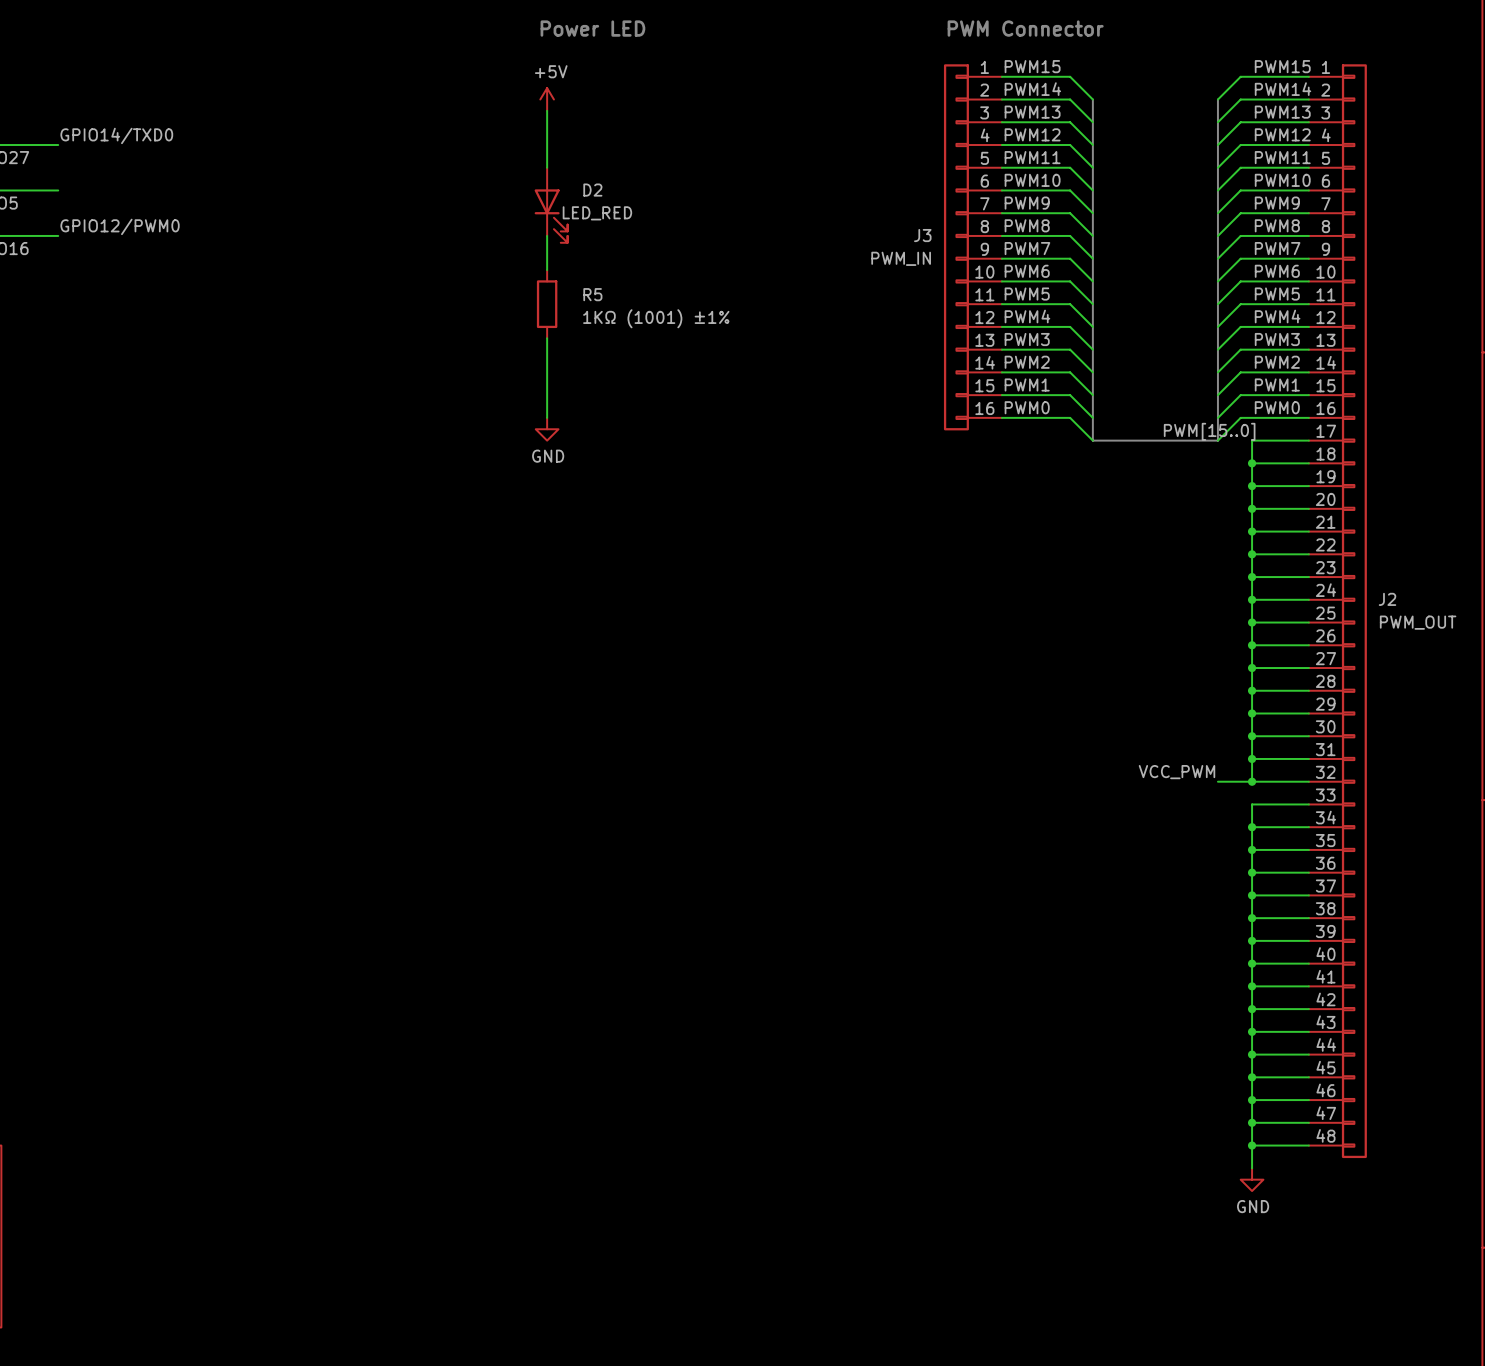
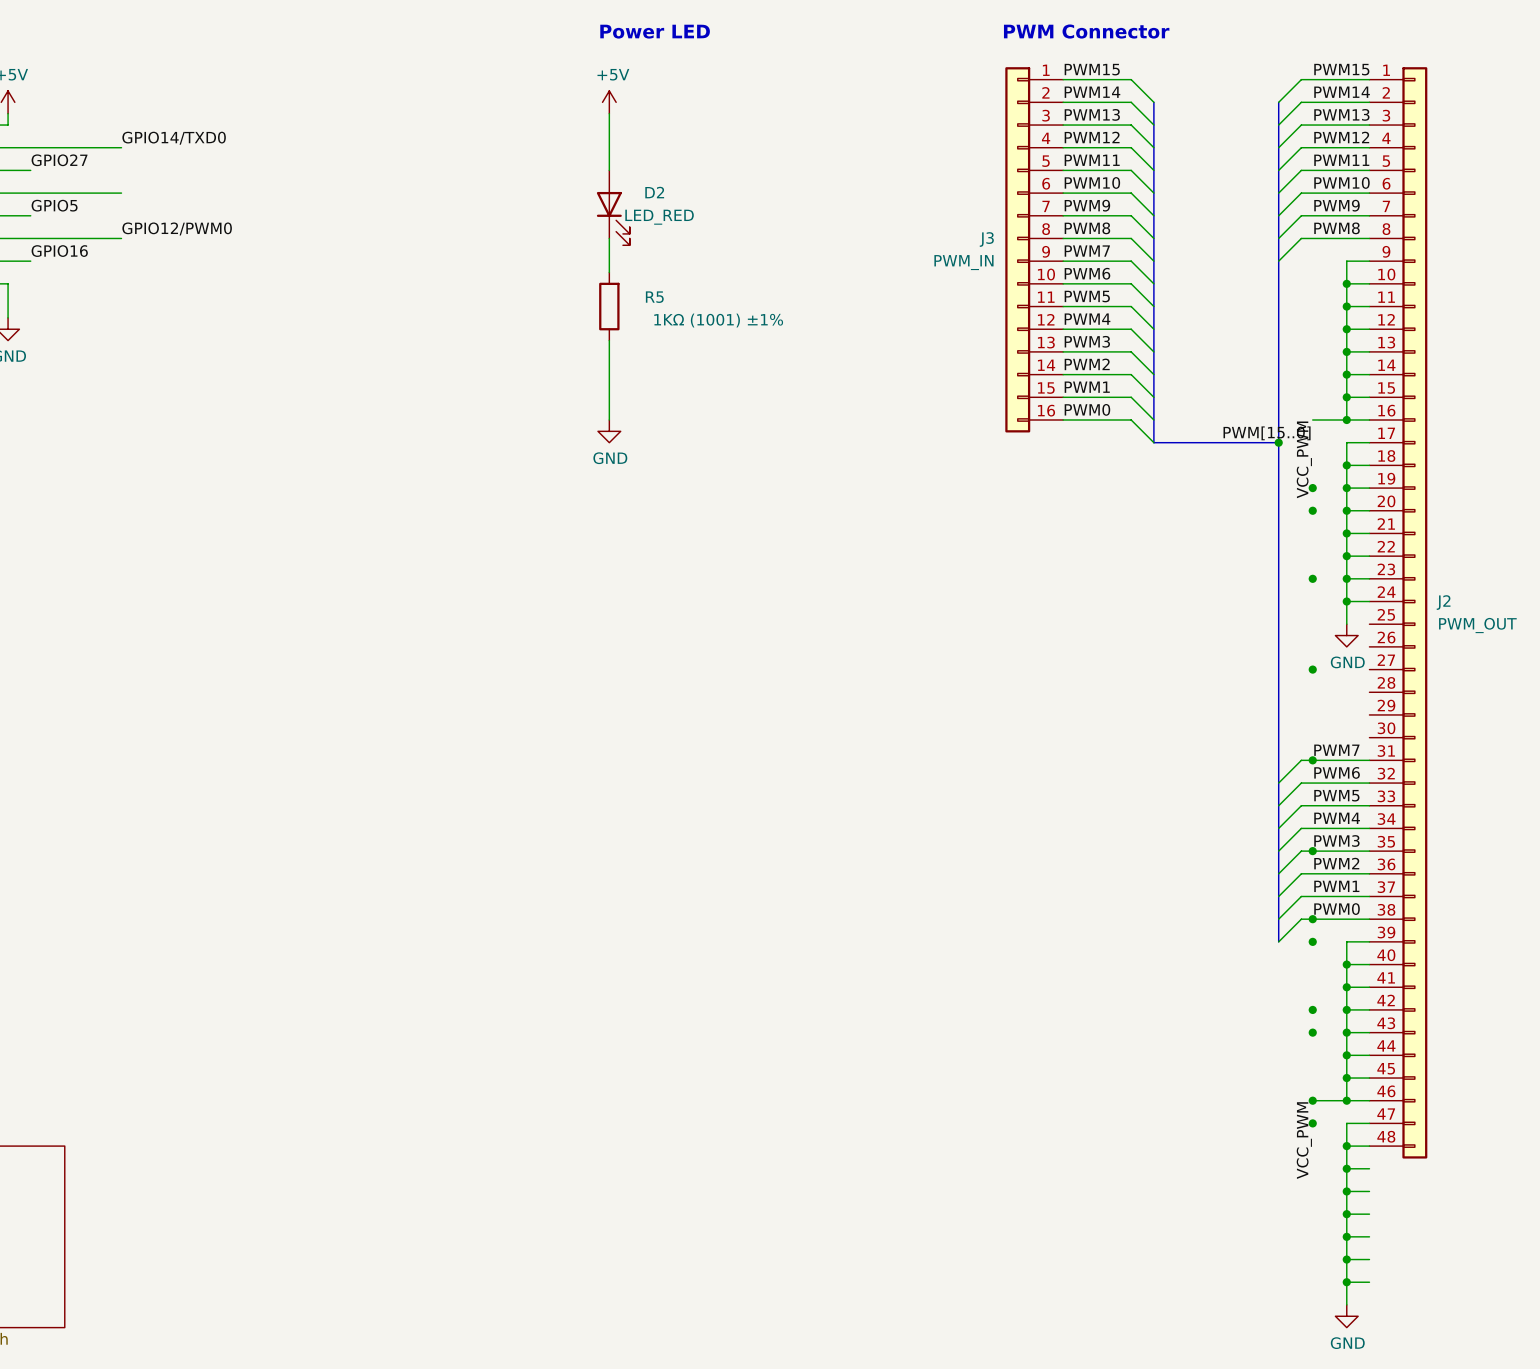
label: PWM7 (1277, 248) -> none
wire: (1286, 258) (1240, 258) (1217, 281) -> (1346, 261) (1346, 419)
label: PWM6 (1277, 271) -> none
wire: (1286, 281) (1240, 281) (1217, 304) -> none
junction: none -> (1346, 283)
label: PWM5 (1277, 294) -> none
wire: (1286, 304) (1240, 304) (1217, 326) -> none
junction: none -> (1346, 306)
label: PWM4 (1277, 316) -> none
wire: (1286, 326) (1240, 326) (1217, 349) -> none
junction: none -> (1346, 329)
label: PWM3 (1277, 339) -> none
wire: (1286, 349) (1240, 349) (1217, 372) -> none
junction: none -> (1346, 351)
label: PWM2 (1277, 362) -> none
wire: (1286, 372) (1240, 372) (1217, 395) -> none
junction: none -> (1346, 374)
label: PWM1 (1277, 384) -> none
wire: (1286, 395) (1240, 395) (1217, 417) -> none
junction: none -> (1346, 397)
label: PWM0 (1277, 407) -> VCC_PWM (1304, 459)
wire: (1252, 417) (1240, 417) (1217, 440) -> none
junction: none -> (1346, 419)
bus: none -> (1278, 442) (1278, 941)
junction: none -> (1278, 442)
wire: (1286, 440) (1252, 440) (1252, 781) -> (1346, 442) (1346, 624)
wire: (1252, 463) (1286, 463) -> none
junction: (1252, 463) -> none
junction: none -> (1346, 465)
wire: (1252, 486) (1286, 486) -> none
junction: none -> (1346, 488)
wire: (1252, 508) (1286, 508) -> none
junction: none -> (1346, 510)
wire: (1252, 531) (1286, 531) -> none
junction: (1252, 531) -> none
junction: none -> (1346, 533)
wire: (1252, 554) (1286, 554) -> none
junction: (1252, 554) -> none
junction: none -> (1346, 556)
wire: (1252, 577) (1286, 577) -> none
junction: none -> (1346, 578)
wire: (1252, 599) (1286, 599) -> none
junction: (1252, 599) -> none
junction: none -> (1346, 601)
wire: (1252, 622) (1308, 622) -> none
junction: (1252, 622) -> none
power symbol: none -> GND (1346, 635)
wire: (1252, 645) (1308, 645) -> none
junction: (1252, 645) -> none
wire: (1252, 668) (1308, 668) -> none
wire: (1252, 690) (1308, 690) -> none
junction: (1252, 690) -> none
wire: (1252, 713) (1308, 713) -> none
junction: (1252, 713) -> none
wire: (1252, 736) (1308, 736) -> none
junction: (1252, 736) -> none
label: none -> PWM7 (1336, 750)
wire: none -> (1312, 760) (1301, 760) (1278, 783)
label: none -> PWM6 (1337, 772)
label: VCC_PWM (1176, 772) -> none
wire: (1217, 781) (1240, 781) -> (1278, 805) (1301, 783)
junction: (1252, 781) -> none
label: none -> PWM5 (1336, 795)
wire: (1252, 804) (1252, 1168) -> (1312, 805) (1301, 805) (1278, 828)
label: none -> PWM4 (1337, 818)
wire: none -> (1312, 828) (1301, 828) (1278, 851)
junction: (1252, 827) -> none
label: none -> PWM3 (1336, 840)
wire: none -> (1312, 851) (1301, 851) (1278, 873)
label: none -> PWM2 (1336, 863)
wire: none -> (1312, 873) (1301, 873) (1278, 896)
junction: (1252, 872) -> none
label: none -> PWM1 (1336, 886)
wire: none -> (1312, 896) (1301, 896) (1278, 919)
junction: (1252, 895) -> none
label: none -> PWM0 (1337, 909)
wire: none -> (1312, 919) (1301, 919) (1278, 941)
wire: (1252, 940) (1286, 940) -> (1346, 1100) (1346, 941)
wire: (1252, 963) (1286, 963) -> none
junction: (1252, 963) -> none
junction: none -> (1346, 964)
wire: (1252, 986) (1286, 986) -> none
junction: (1252, 986) -> none
junction: none -> (1346, 987)
wire: (1252, 1009) (1286, 1009) -> none
junction: none -> (1346, 1009)
wire: (1252, 1031) (1286, 1031) -> none
junction: none -> (1346, 1032)
wire: (1252, 1054) (1286, 1054) -> none
junction: (1252, 1054) -> none
junction: none -> (1346, 1055)
wire: (1252, 1077) (1286, 1077) -> none
junction: (1252, 1077) -> none
junction: none -> (1346, 1078)
junction: none -> (1346, 1100)
wire: (1252, 1122) (1286, 1122) -> (1346, 1304) (1346, 1123)
label: none -> VCC_PWM (1304, 1140)
wire: (1252, 1145) (1286, 1145) -> none
junction: (1252, 1145) -> none
junction: none -> (1346, 1146)
wire: none -> (1346, 1168) (1369, 1168)
junction: none -> (1346, 1168)
power symbol position: GND (1252, 1179) -> GND (1346, 1316)
wire: none -> (1346, 1191) (1369, 1191)
junction: none -> (1346, 1191)
wire: none -> (1346, 1214) (1369, 1214)
junction: none -> (1346, 1214)
wire: none -> (1346, 1236) (1369, 1236)
junction: none -> (1346, 1236)
wire: none -> (1346, 1259) (1369, 1259)
junction: none -> (1346, 1259)
wire: none -> (1346, 1282) (1369, 1282)
junction: none -> (1346, 1282)

